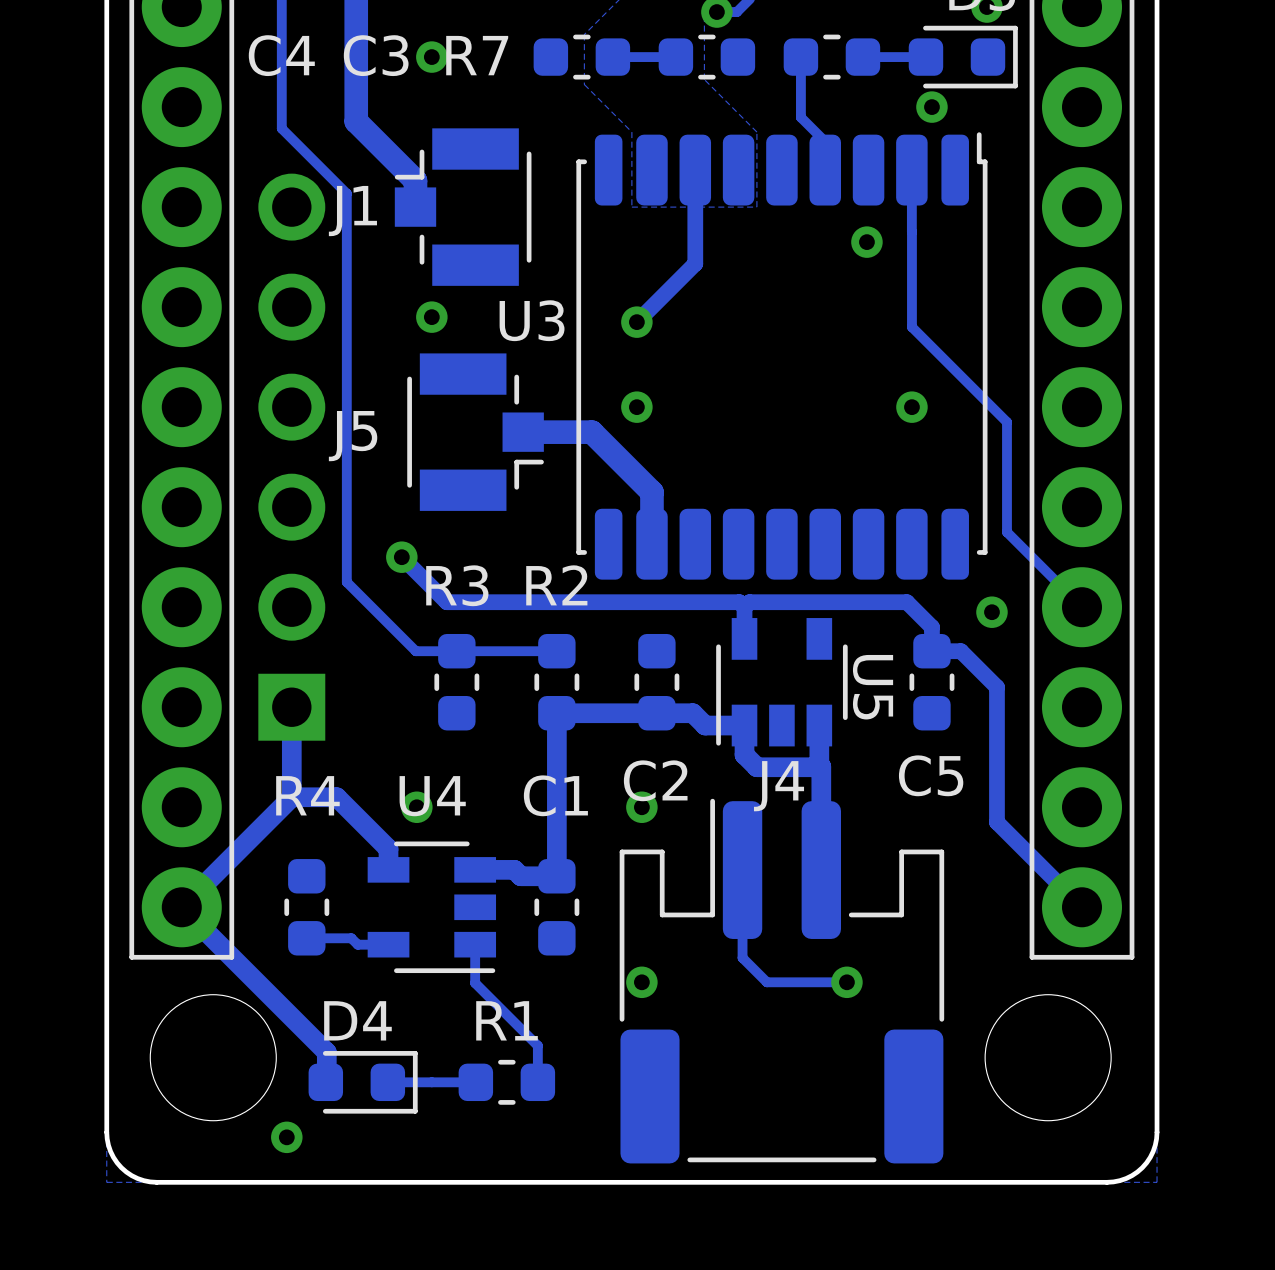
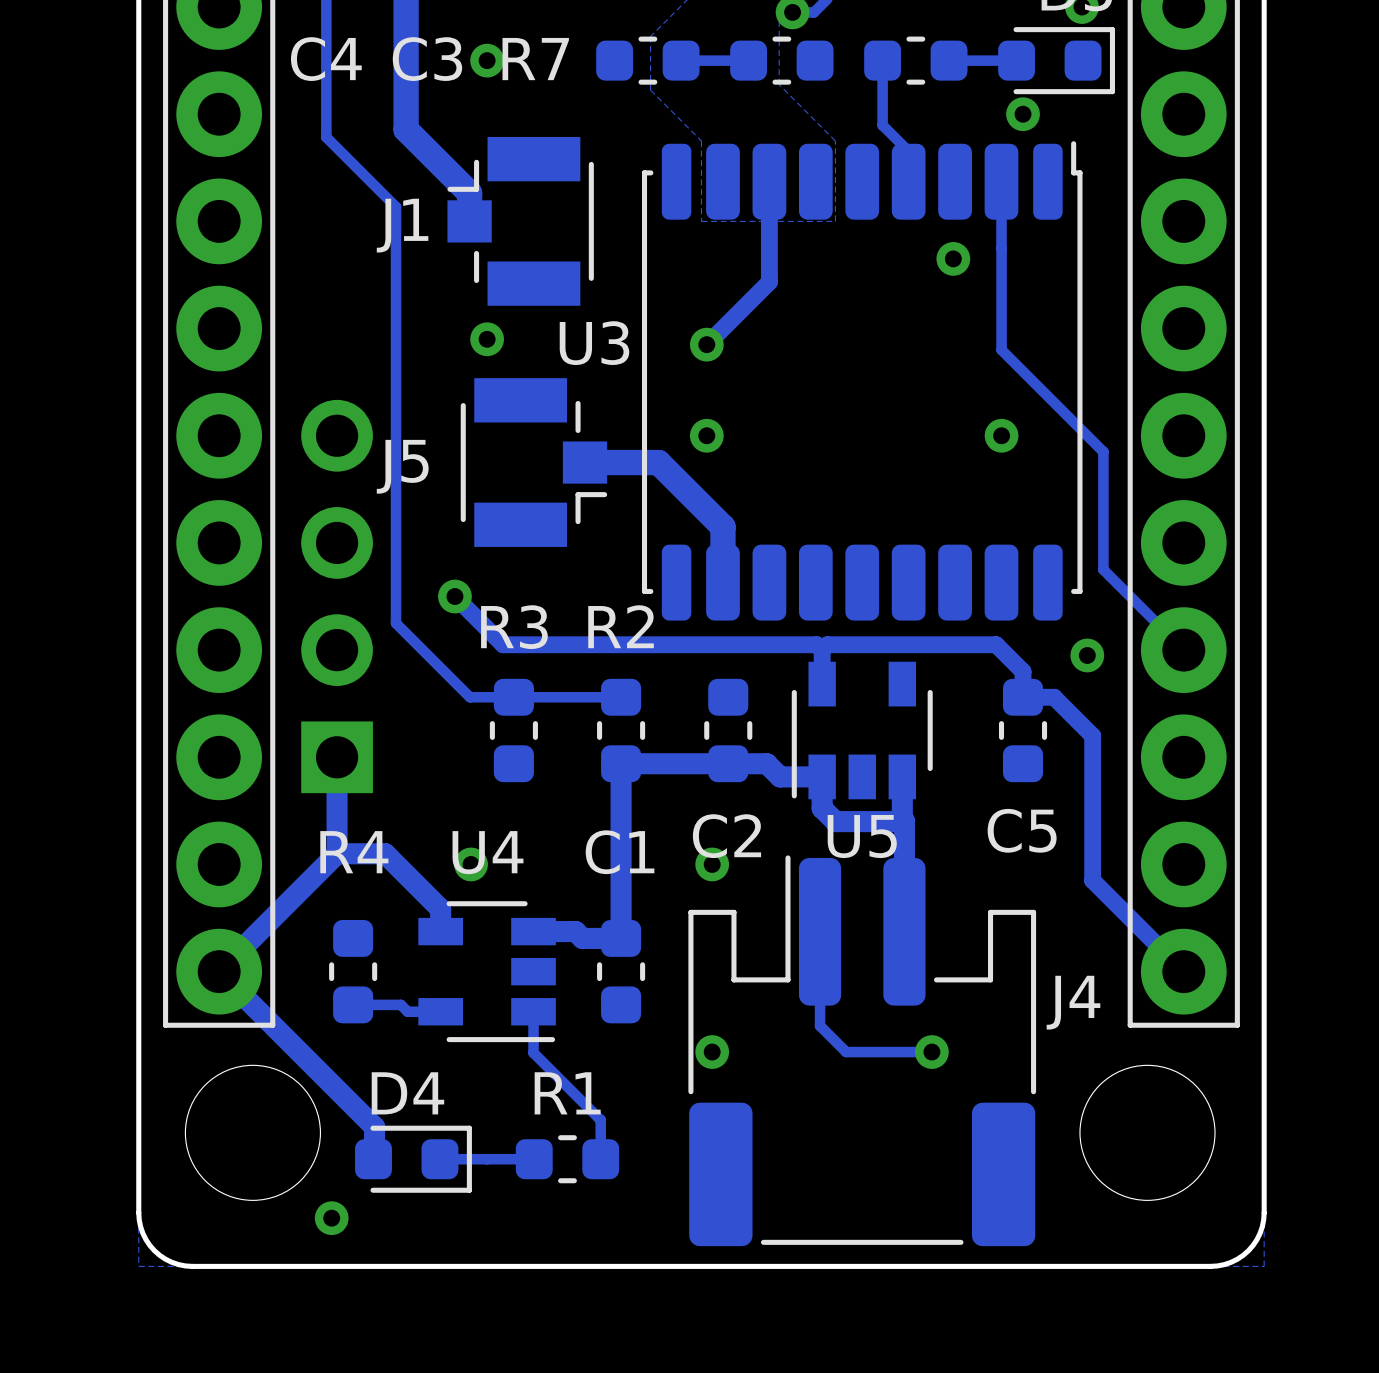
part: (291, 457) -> none
U5 name rotation: 0° (873, 687) -> 90° counterclockwise (862, 836)
U5 name position: U5 (873, 687) -> U5 (862, 836)
J4 name position: J4 (779, 786) -> J4 (1073, 1002)

